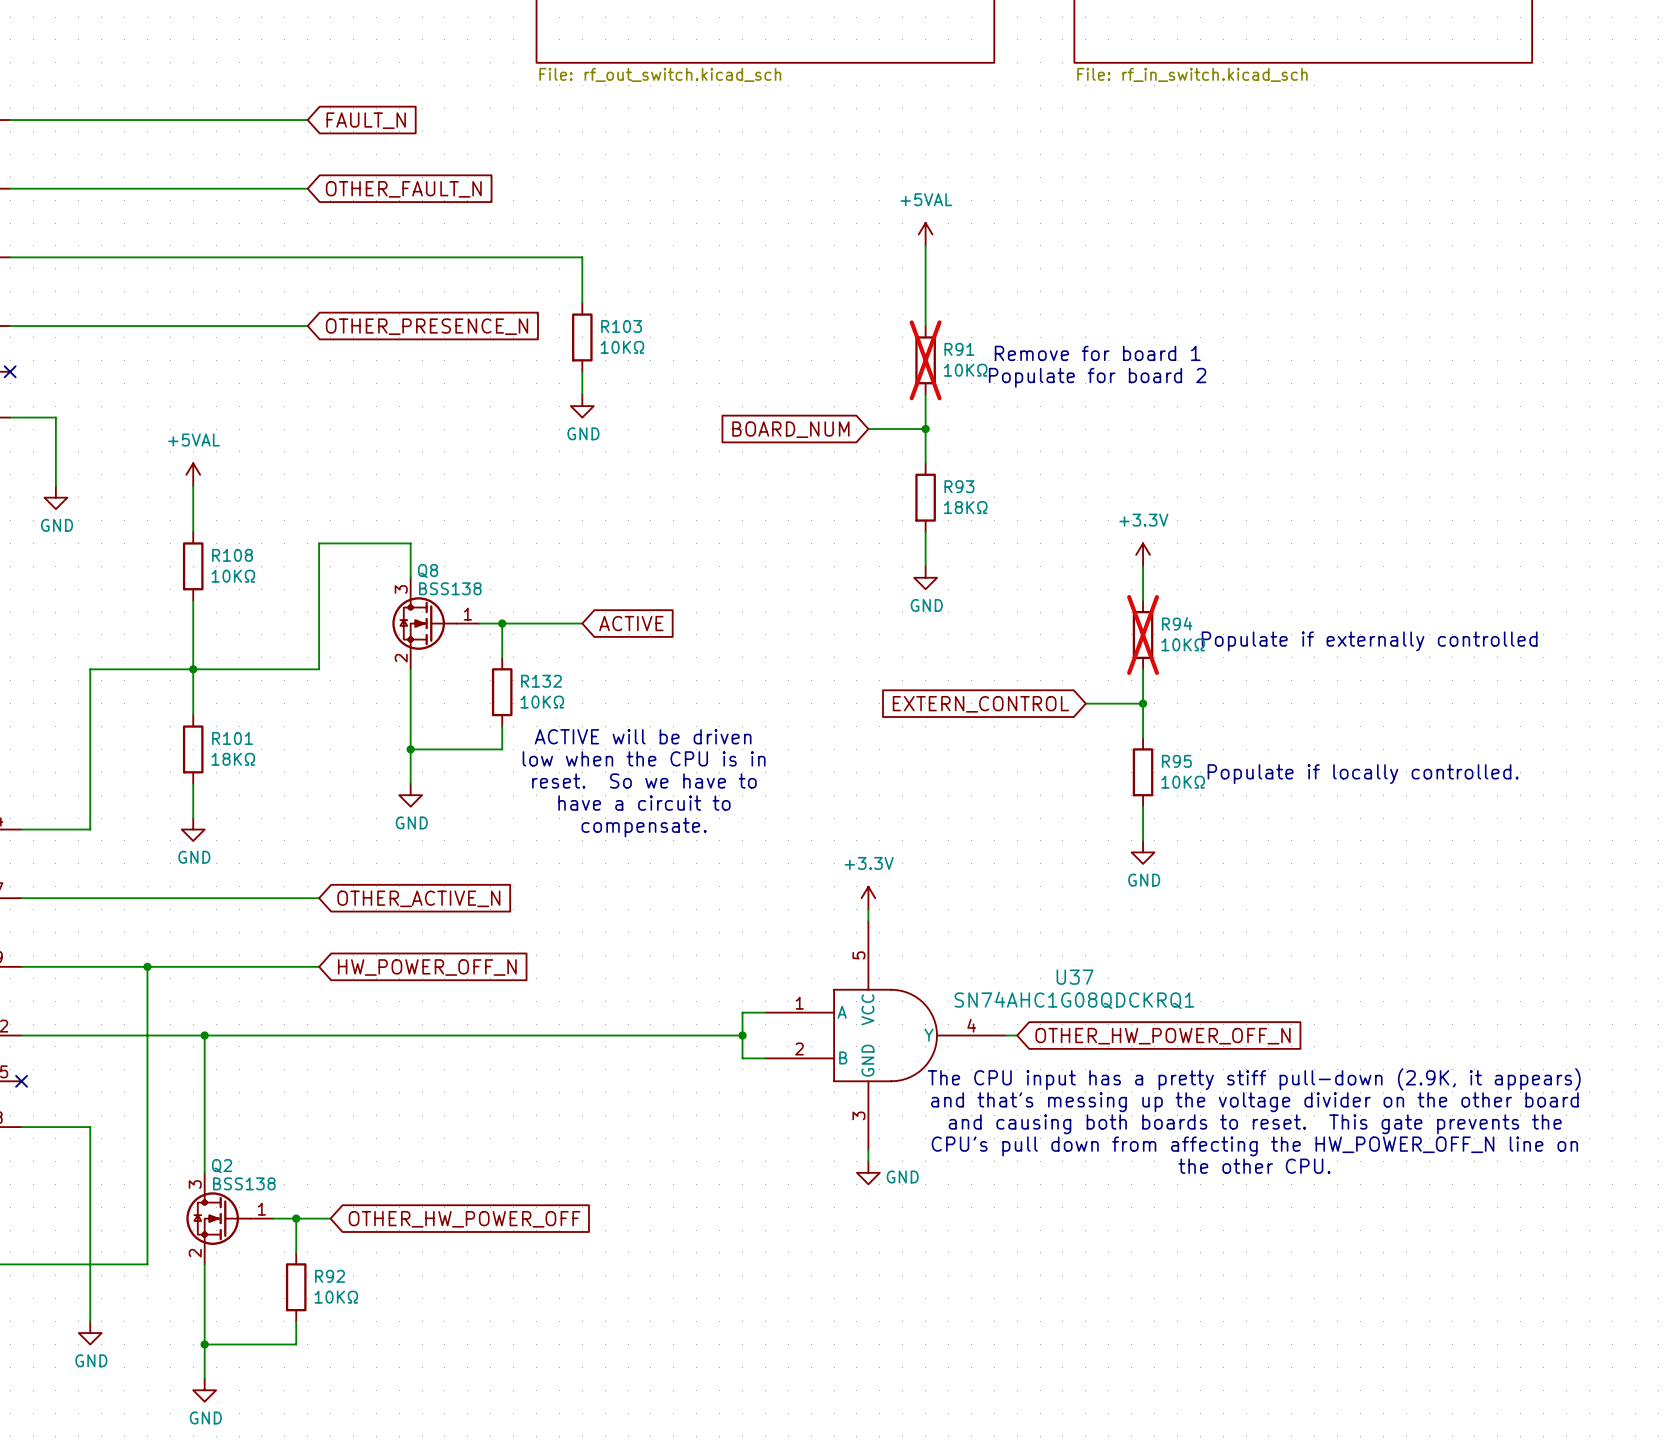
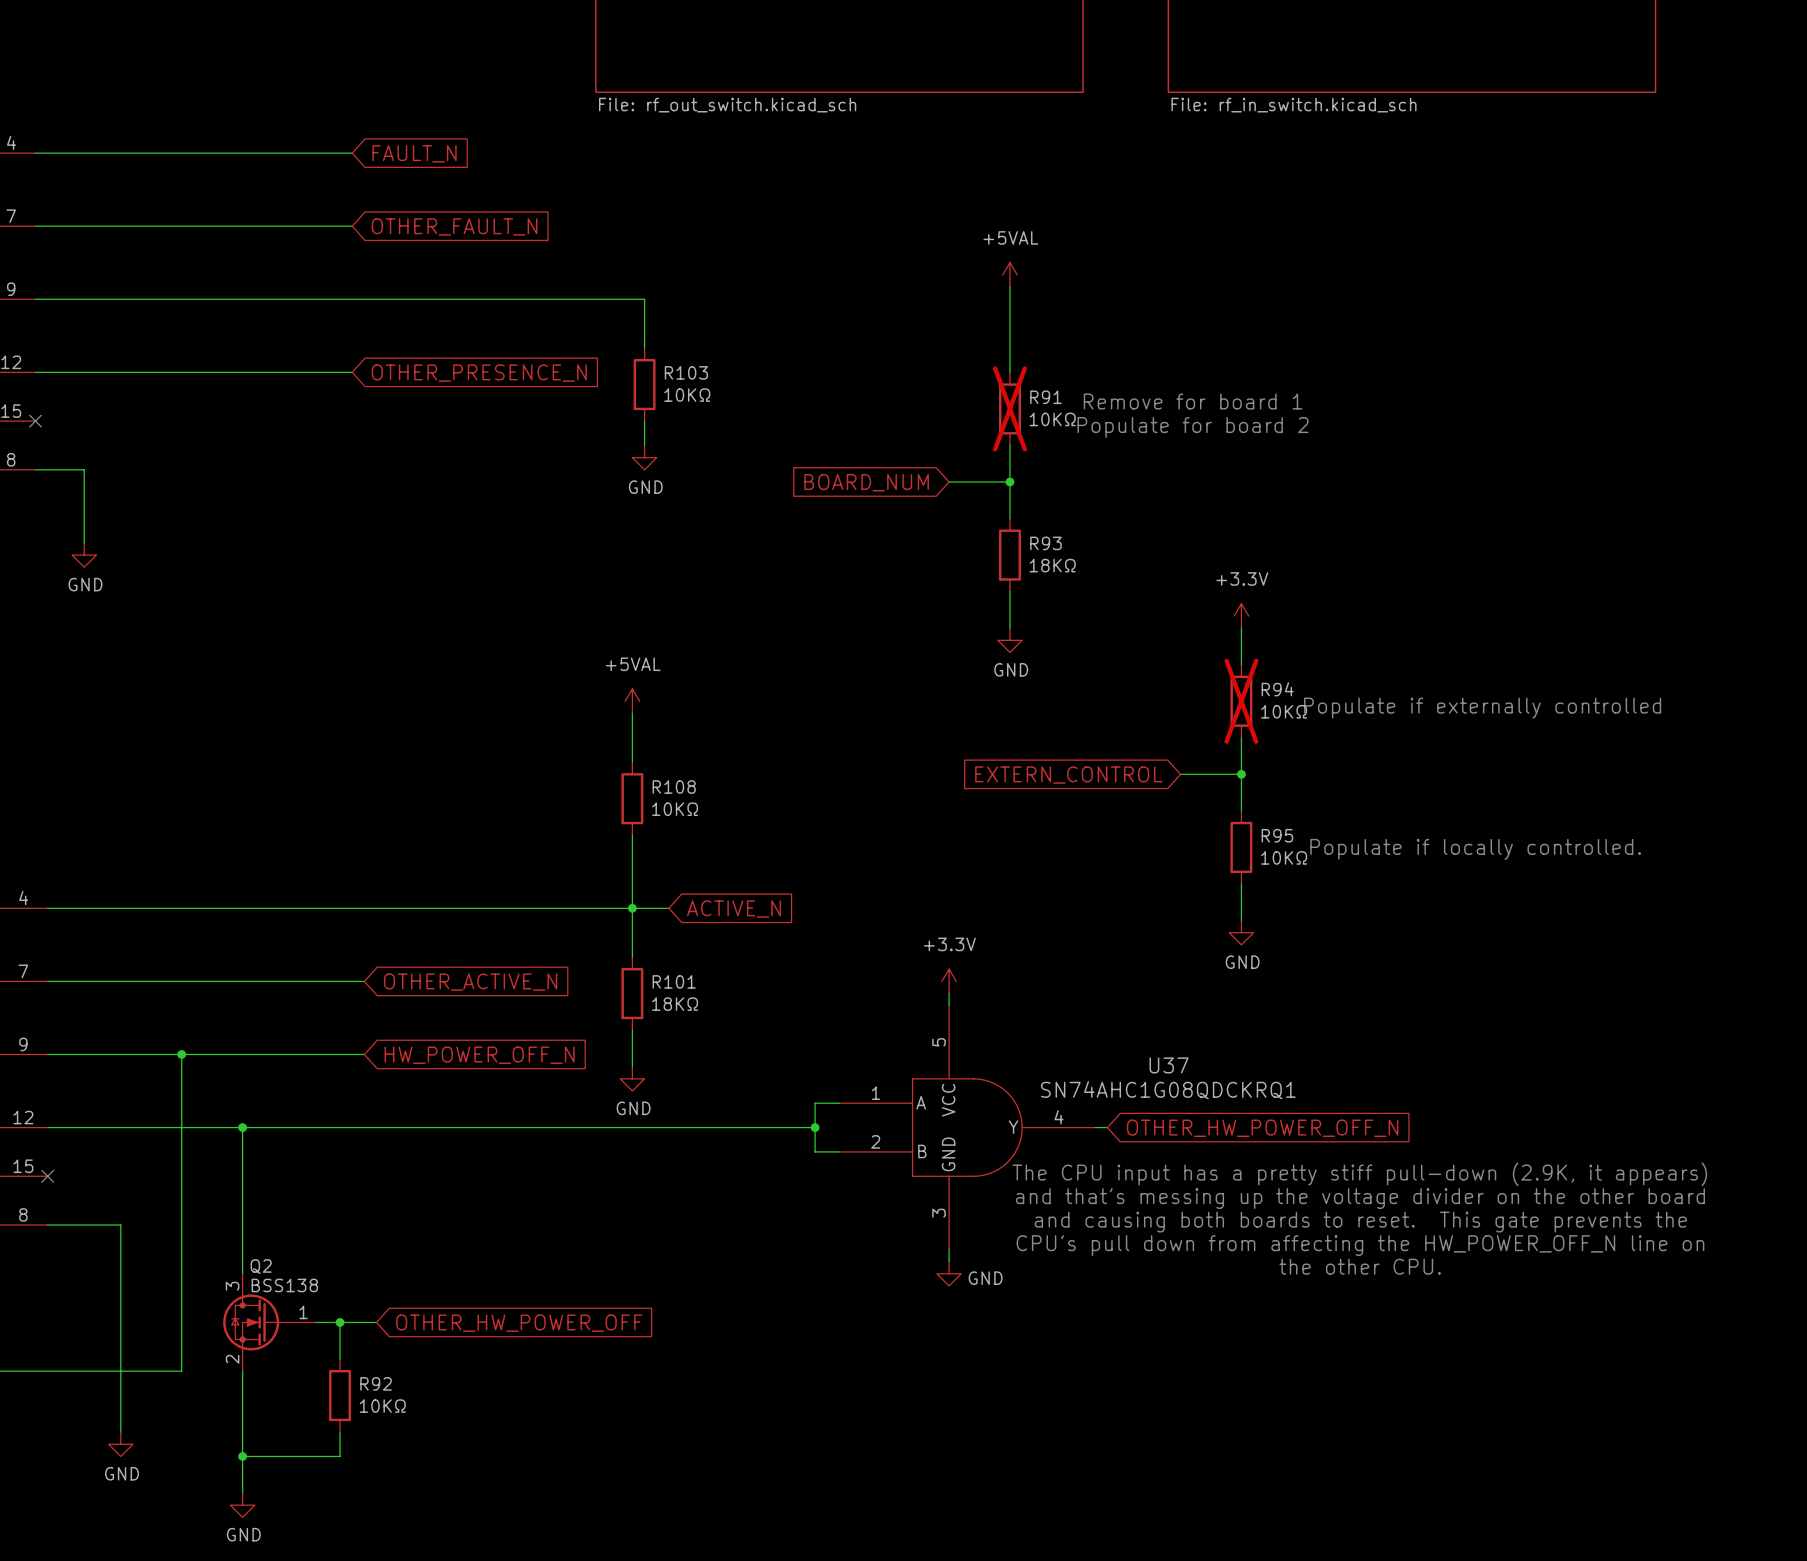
power symbol: +5VAL (193, 474) -> none
wire: (193, 486) (193, 532) -> none
R108 position: (193, 566) -> (632, 798)
wire: (410, 577) (410, 543) (319, 543) (319, 669) (90, 669) (90, 829) -> (668, 908) (120, 908)
wire: (193, 600) (193, 715) -> none
Q8: BSS138 (435, 623) -> none
wire: (479, 623) (582, 623) -> none
wire: (502, 623) (502, 657) -> none
junction: (502, 623) -> none
global label: ACTIVE (631, 623) -> none
power symbol: none -> +5VAL (632, 701)
wire: none -> (632, 713) (632, 762)
junction: (193, 669) -> none
wire: (410, 669) (410, 783) -> (632, 835) (632, 957)
R132: 10KΩ (502, 692) -> none
wire: (502, 726) (502, 749) (410, 749) -> none
text: ACTIVE will be driven (643, 736) -> none
R101 position: (193, 749) -> (632, 993)
junction: (410, 749) -> none
text: low when the CPU is in (644, 758) -> none
text: reset. So we have to (644, 780) -> none
wire: (193, 783) (193, 818) -> none
power symbol: GND (410, 795) -> none
text: have a circuit to (644, 803) -> none
text: compensate. (644, 827) -> none
power symbol: GND (193, 829) -> none
junction: none -> (632, 908)
global label: none -> ACTIVE_N (734, 909)
wire: none -> (632, 1030) (632, 1066)
power symbol: none -> GND (632, 1078)

